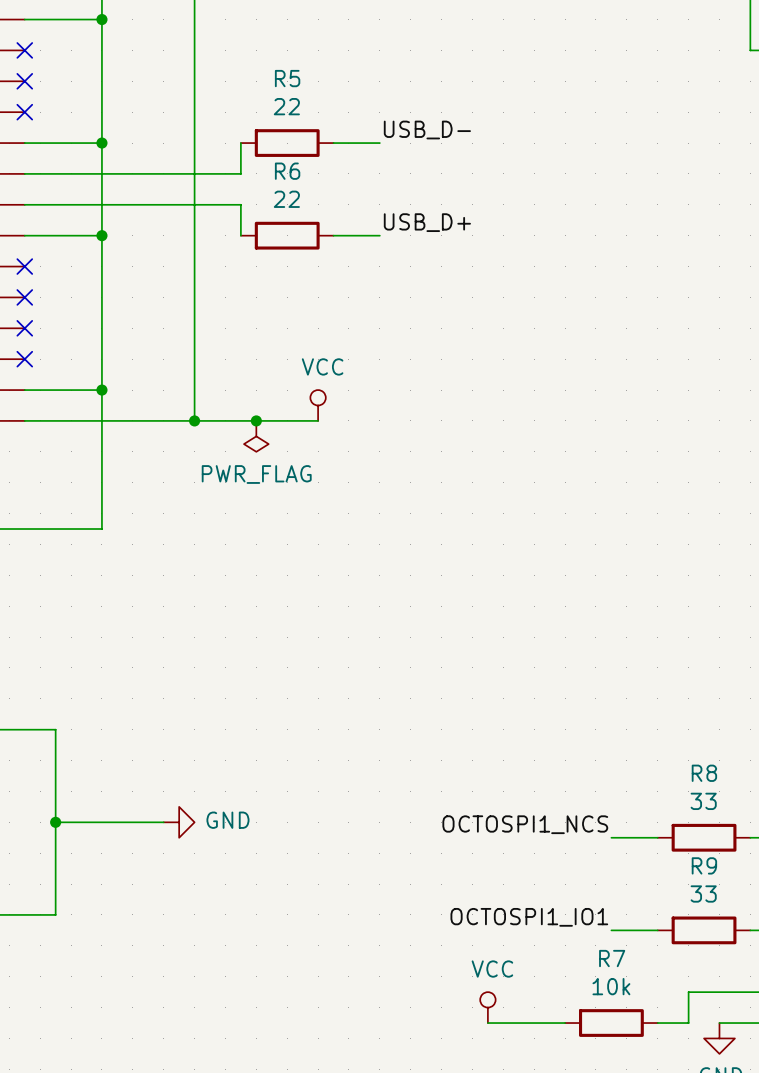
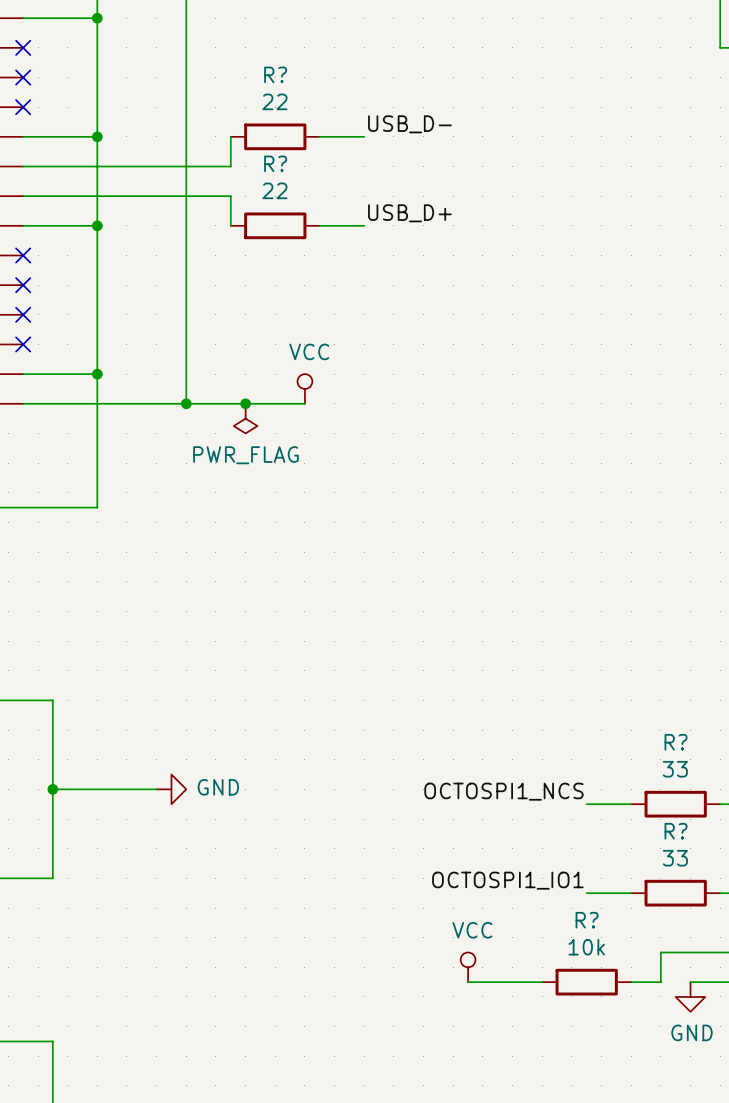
R5 name: R5 (287, 78) -> R? (275, 74)
R6 name: R6 (287, 171) -> R? (275, 163)
R8 name: R8 (704, 773) -> R? (676, 742)
R9 name: R9 (704, 865) -> R? (676, 831)
R7 name: R7 (612, 958) -> R? (587, 920)

